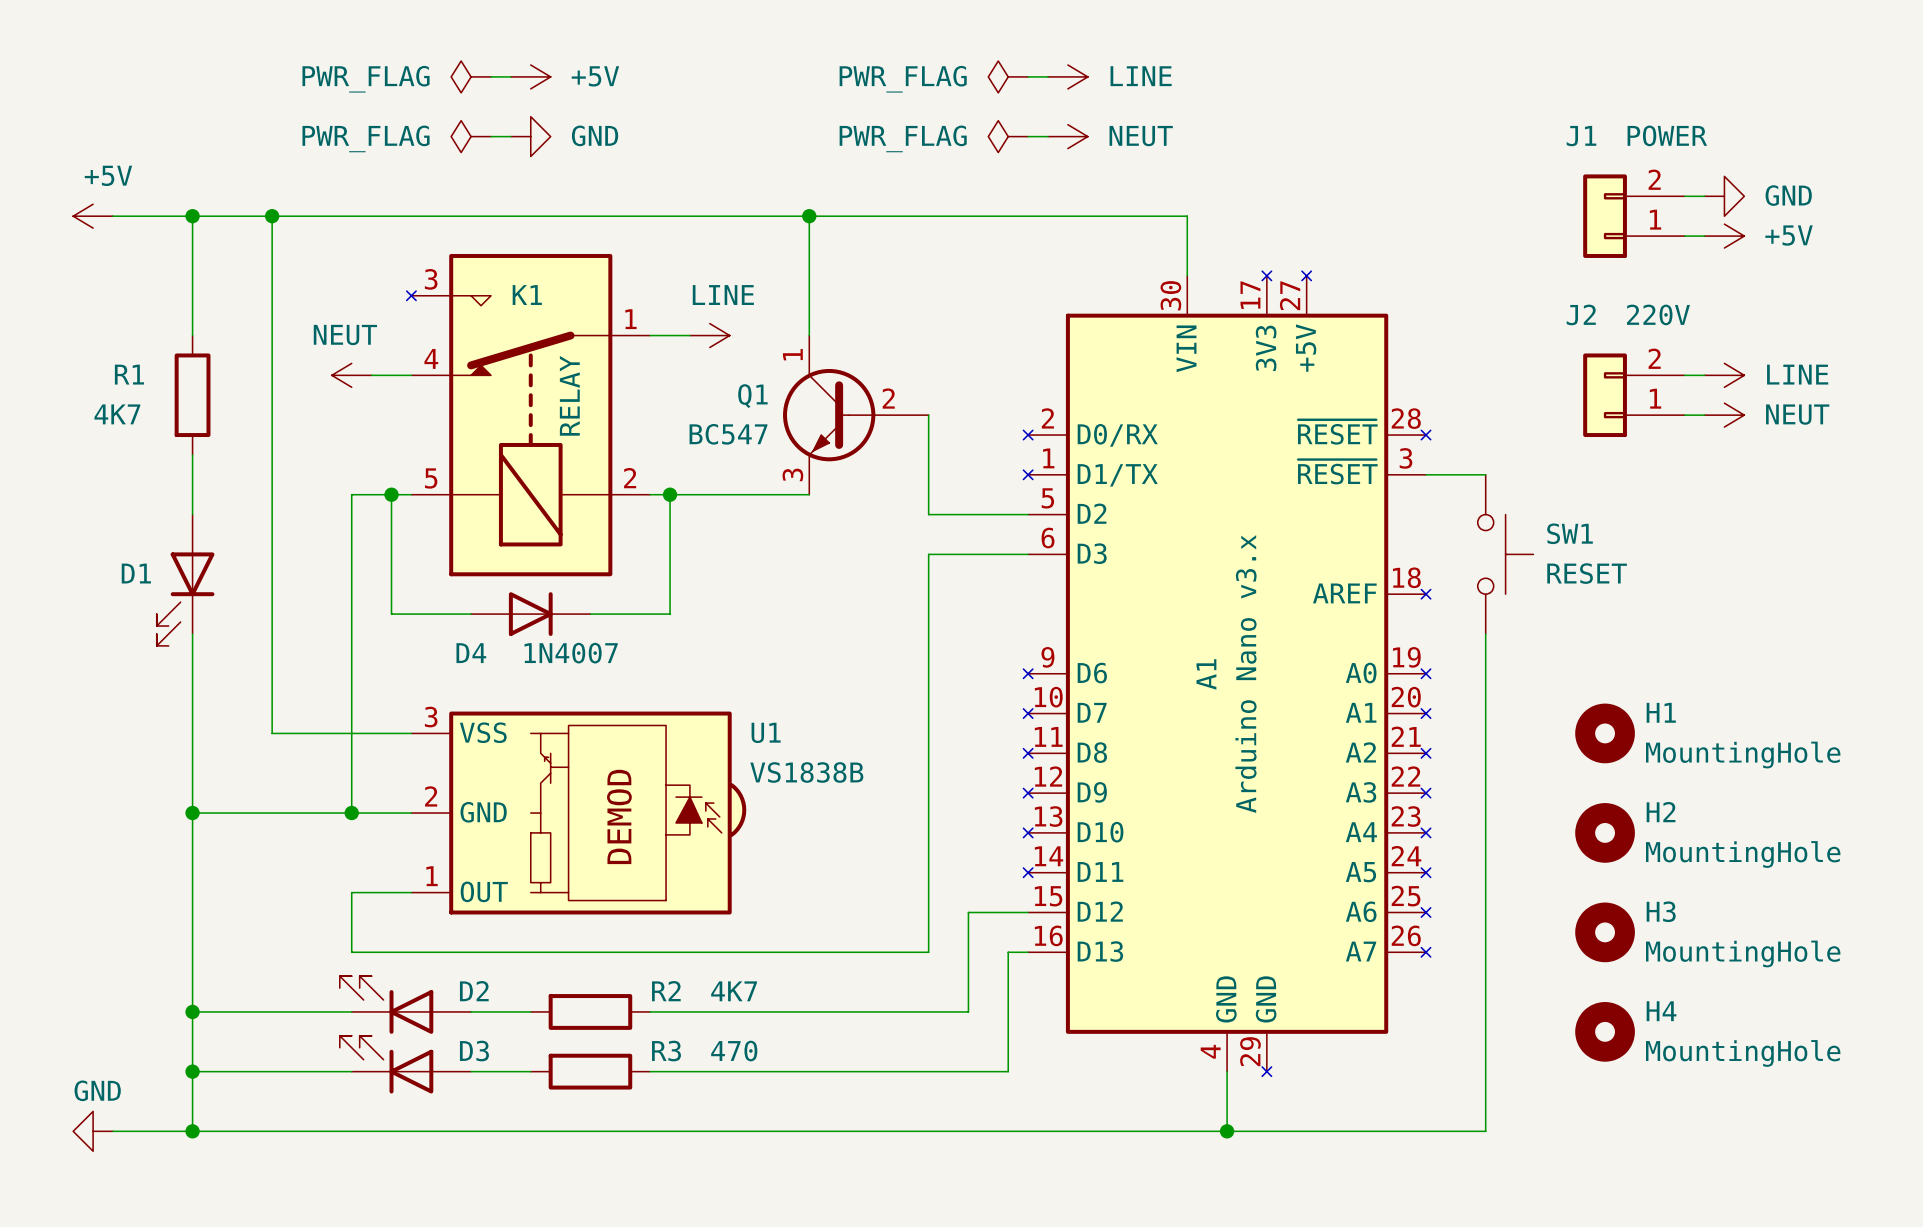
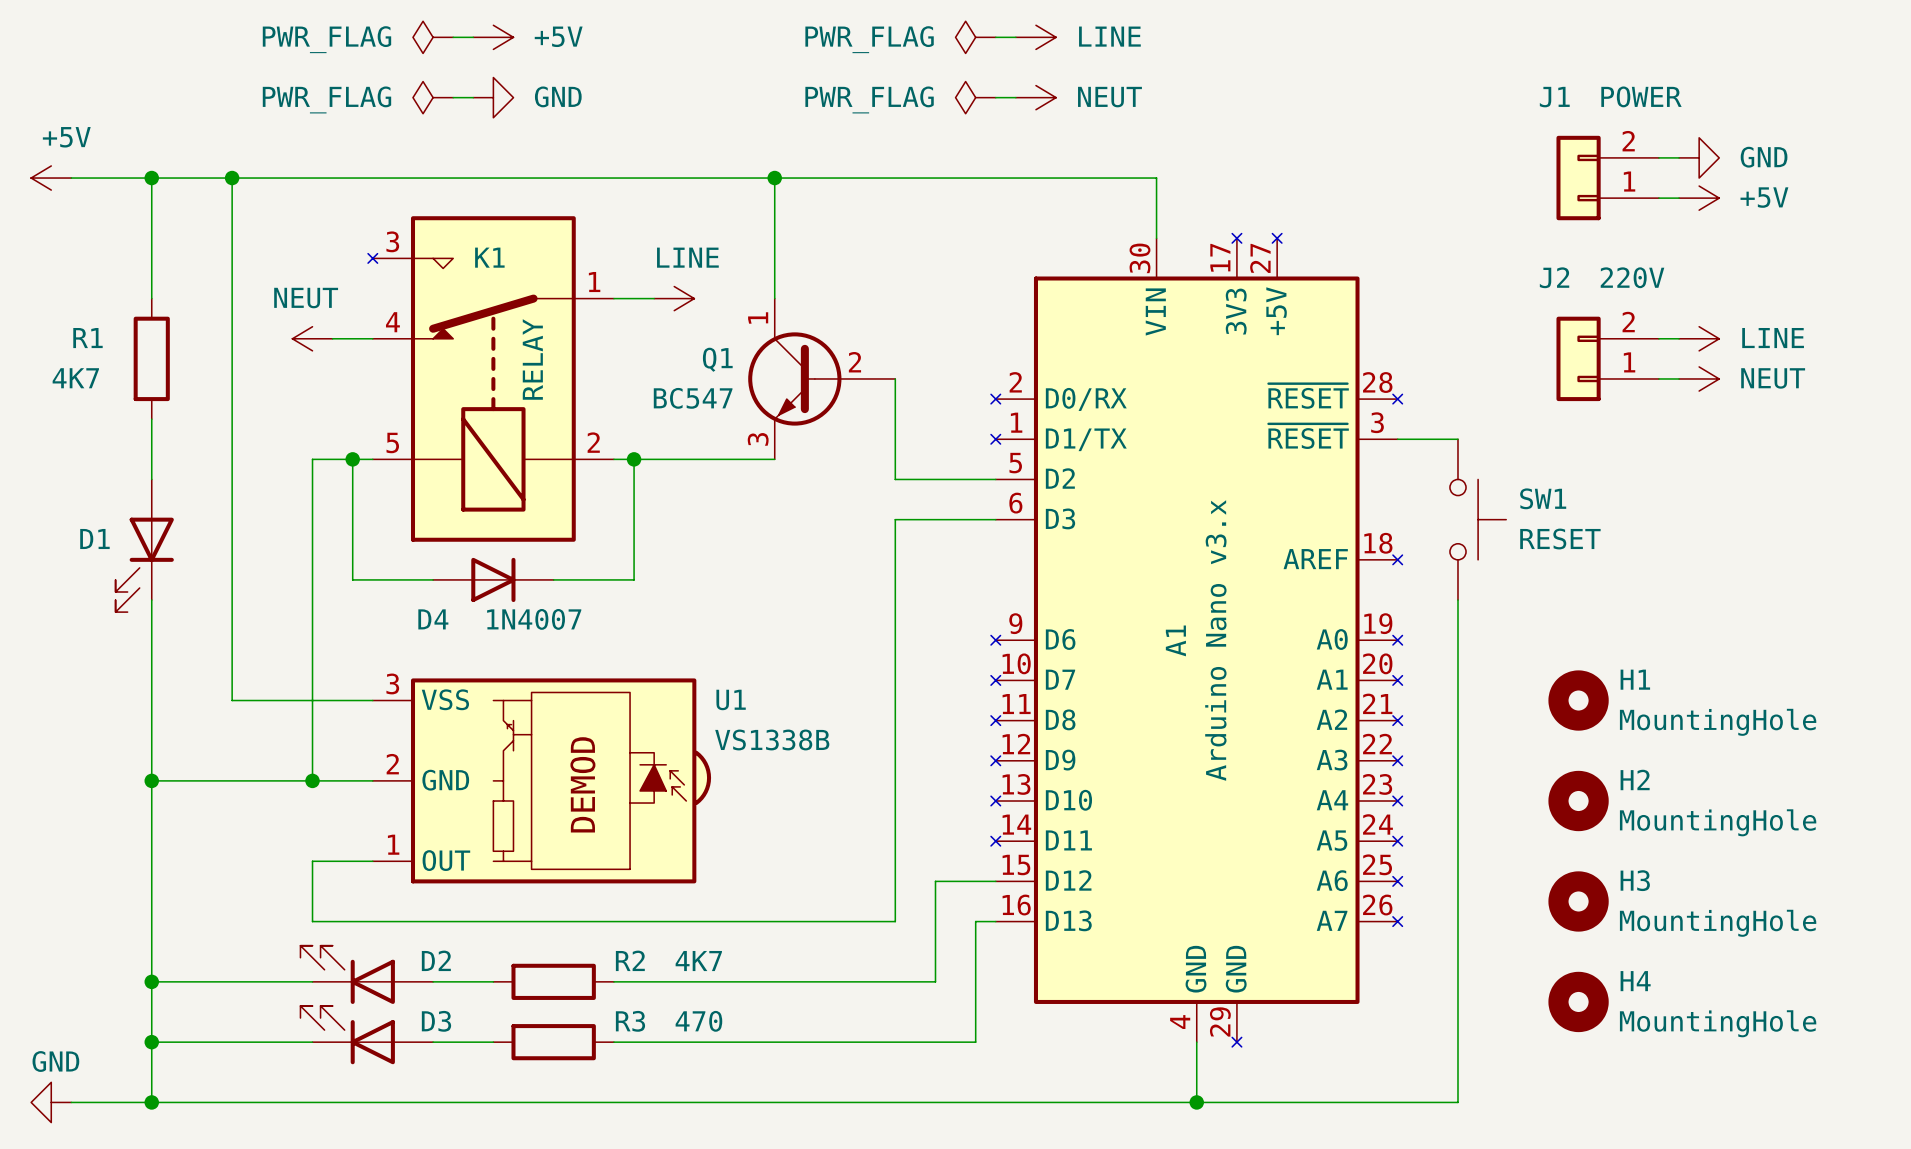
U1 value: VS1838B (806, 772) -> VS1338B (772, 739)

